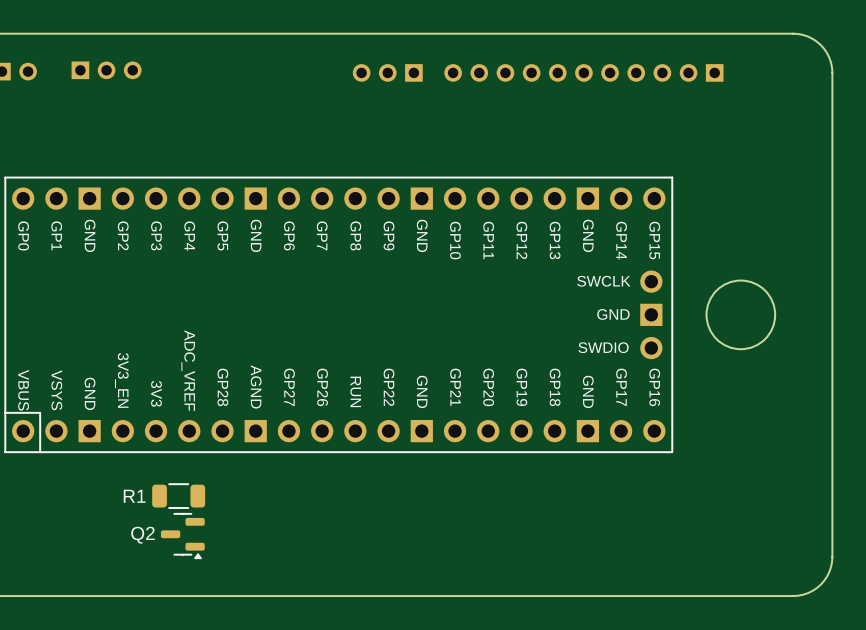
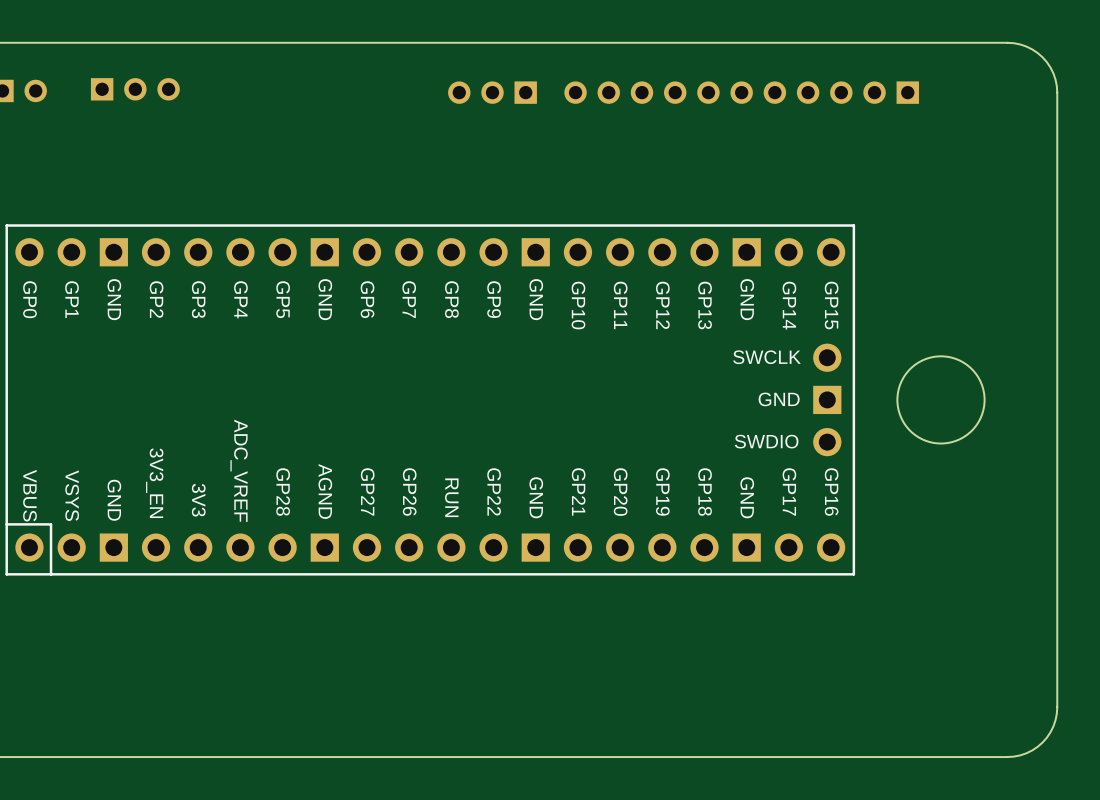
R1: (178, 496) -> none
Q2: (182, 536) -> none

